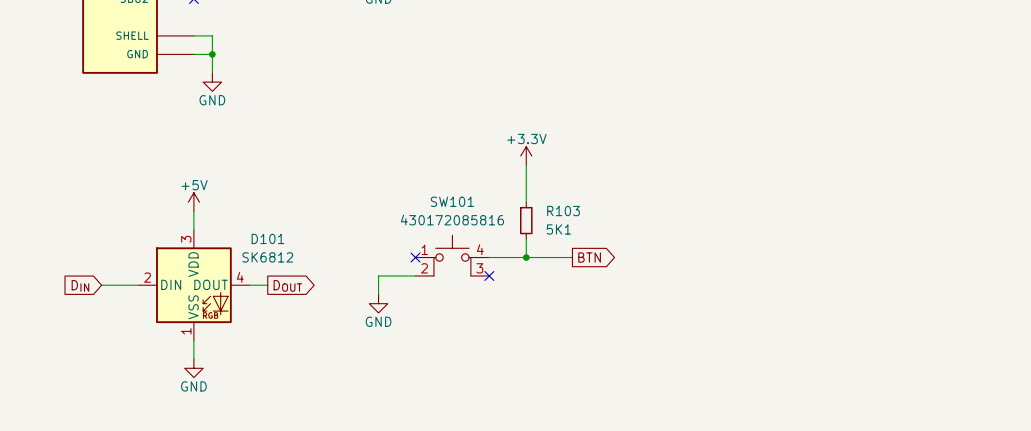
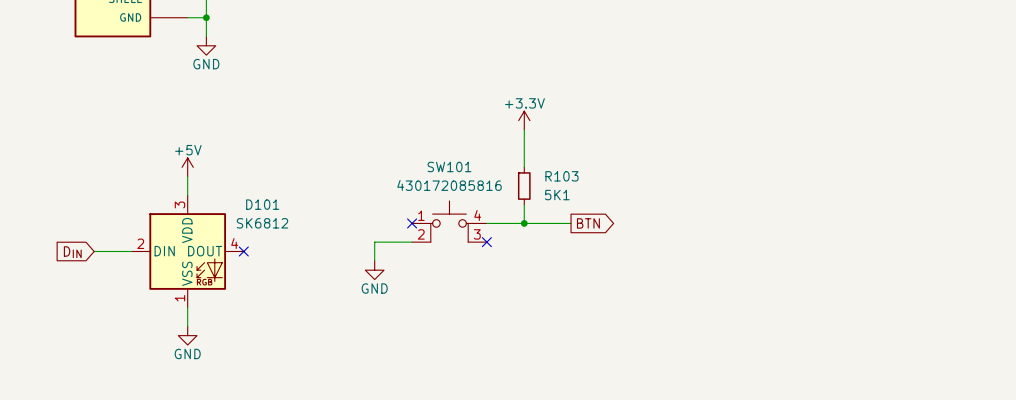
wire: (249, 285) (267, 285) -> none
no-connect mark: none -> (243, 251)
global label: DOUT (287, 285) -> none

